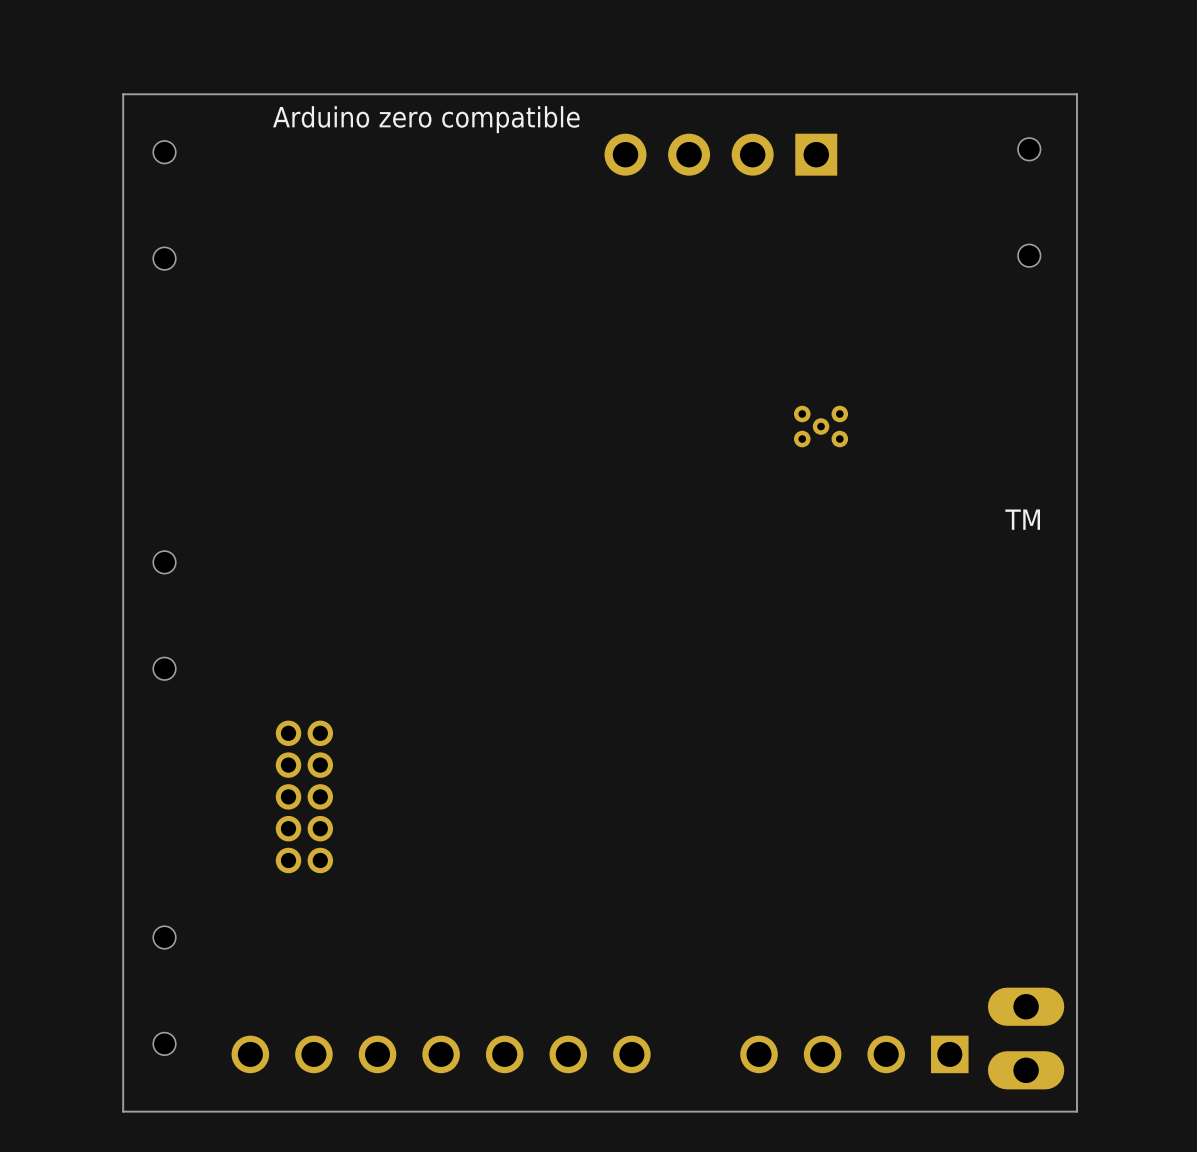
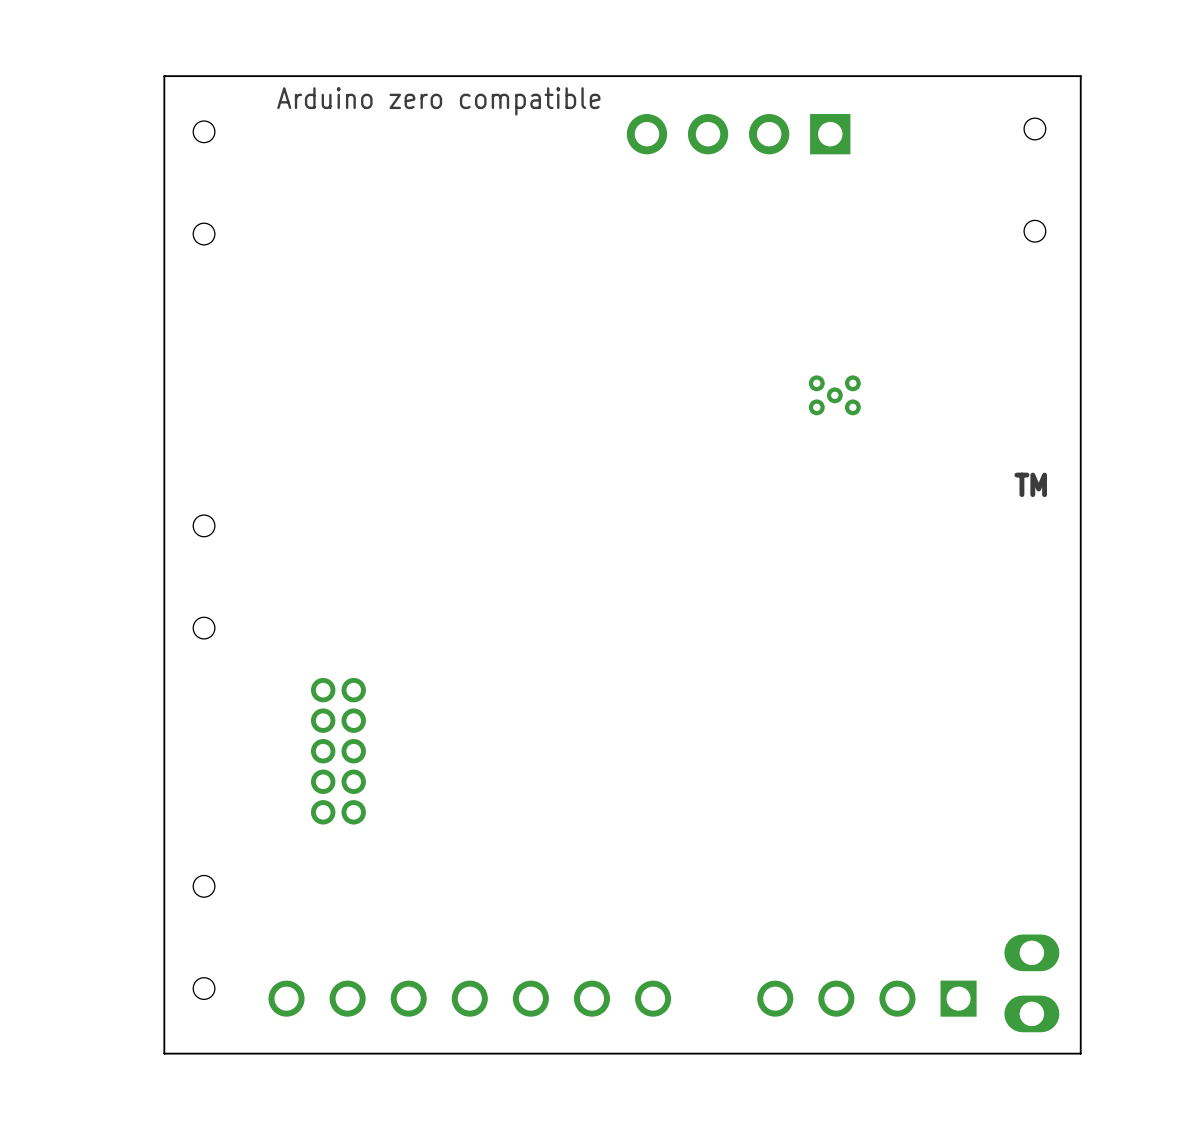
part footprint: [987, 987, 1065, 1090] -> [1004, 934, 1060, 1033]

